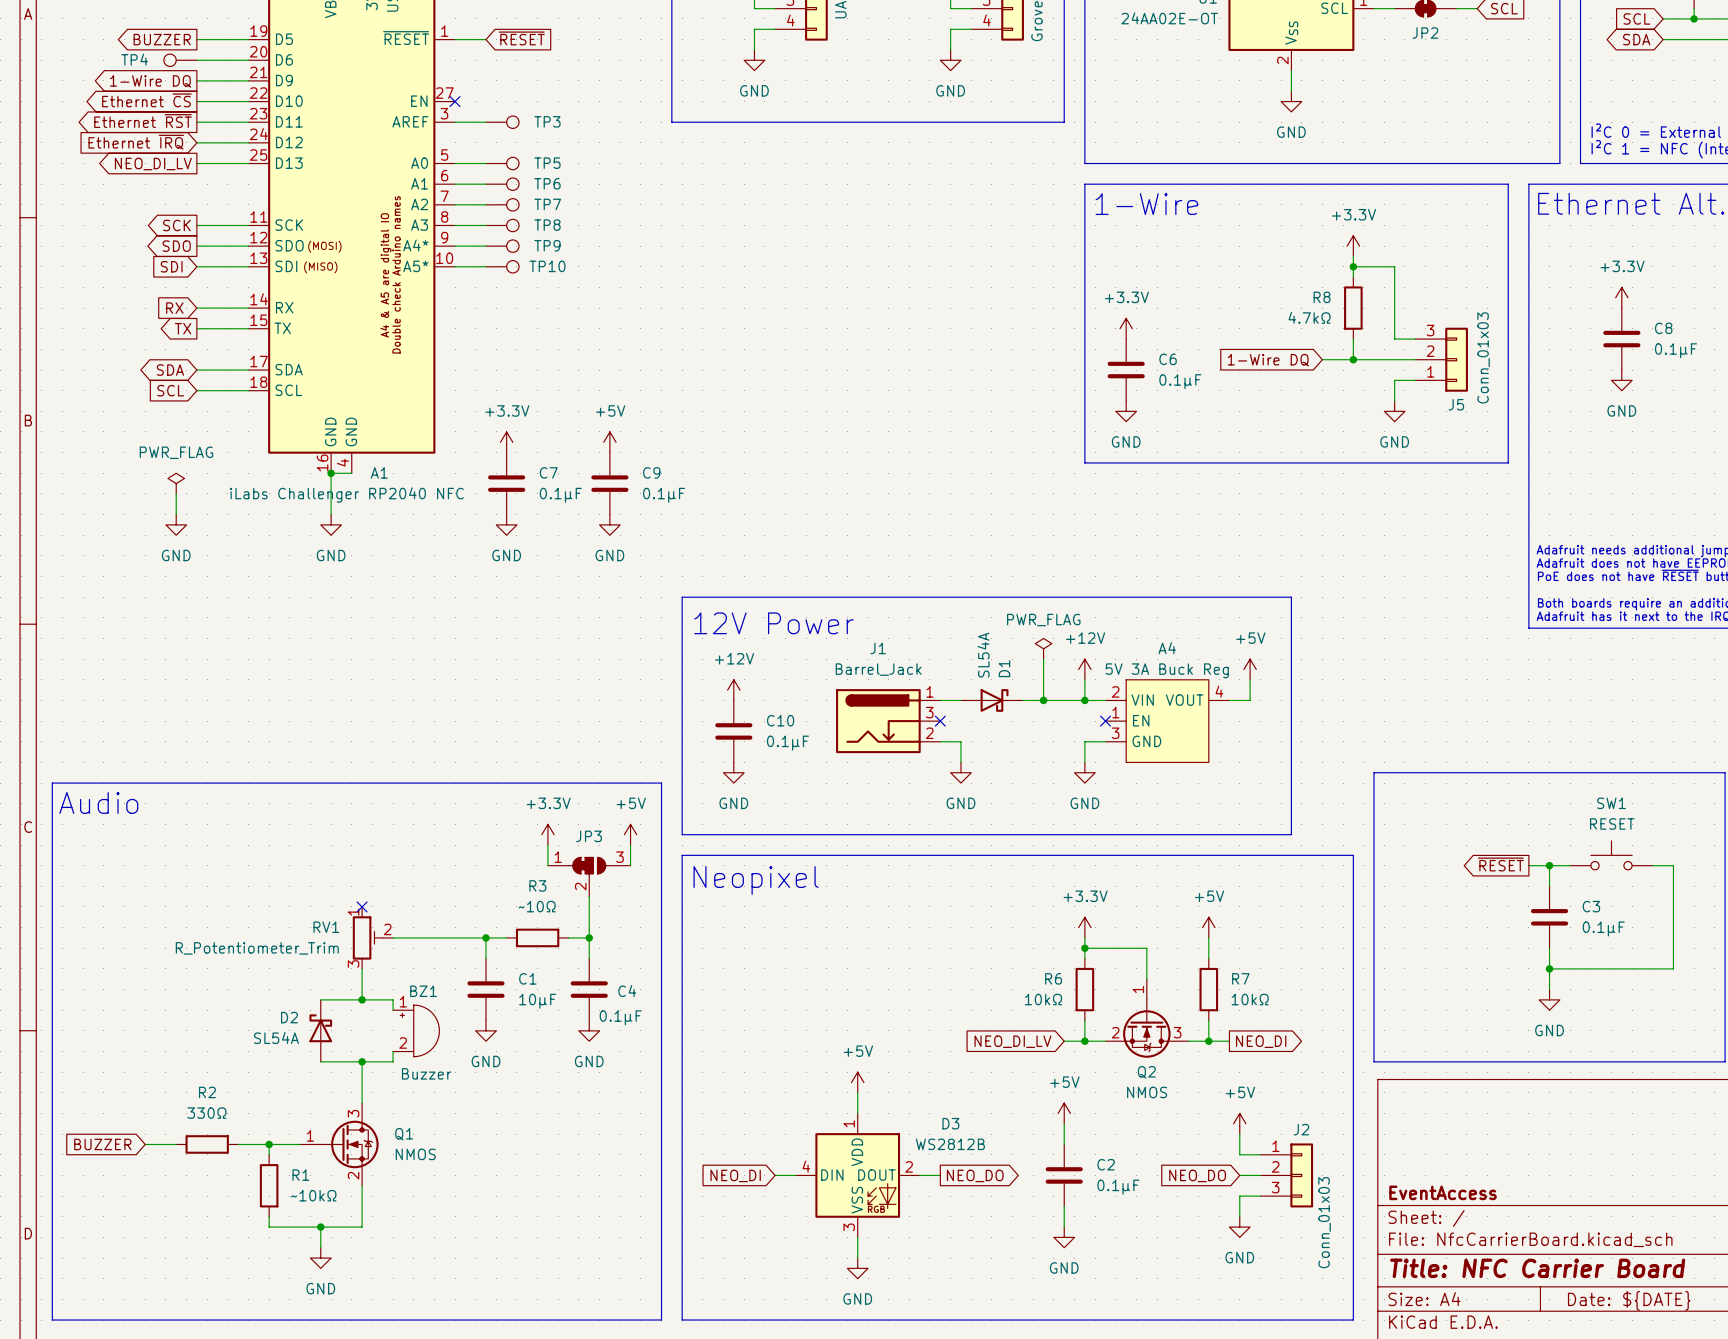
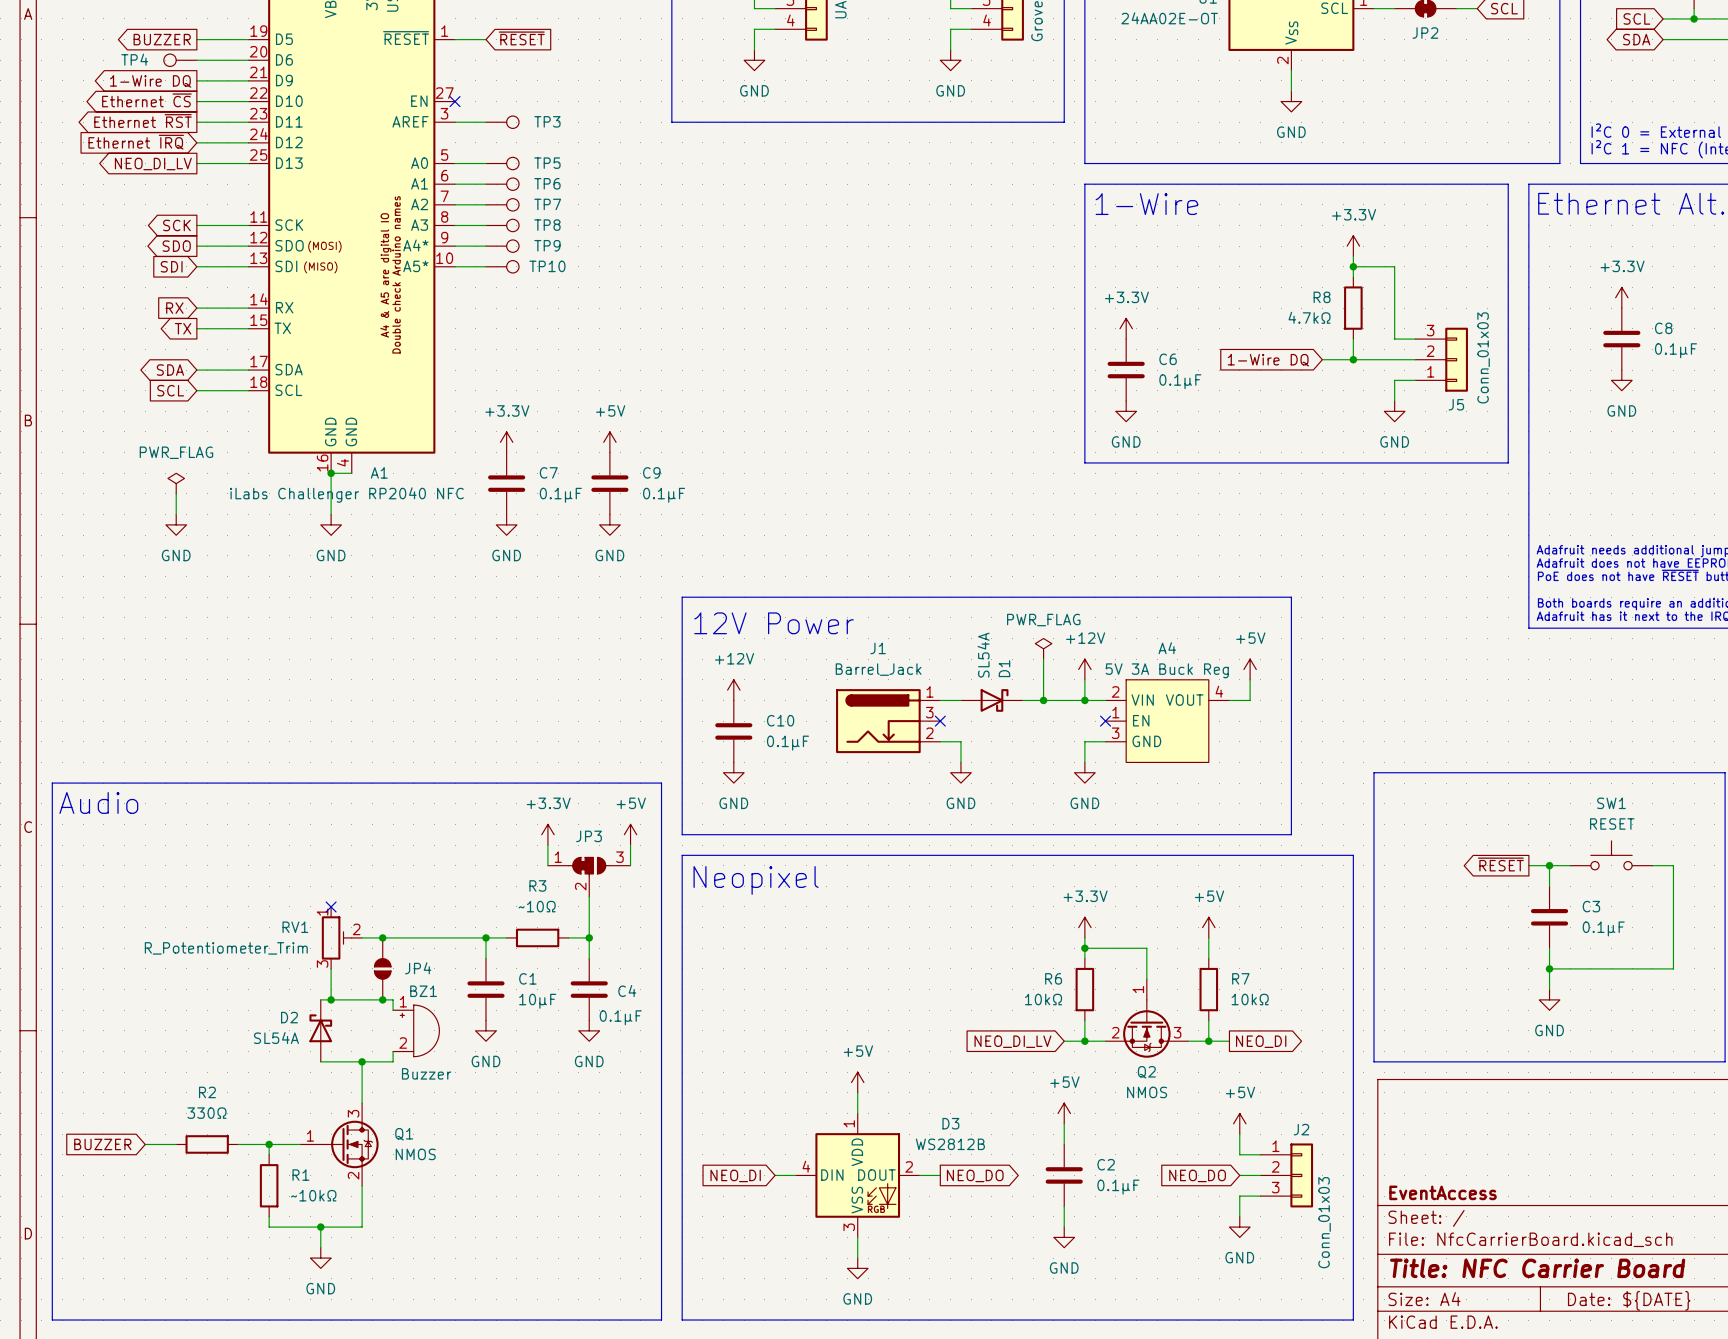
no-connect mark position: (362, 906) -> (331, 906)
RV1 position: (372, 937) -> (341, 937)
junction: none -> (382, 937)
wire: (362, 968) (362, 999) -> (331, 968) (331, 999)
JP4: none -> (382, 968)
junction: none -> (331, 999)
junction: (362, 999) -> none
junction: none -> (382, 999)

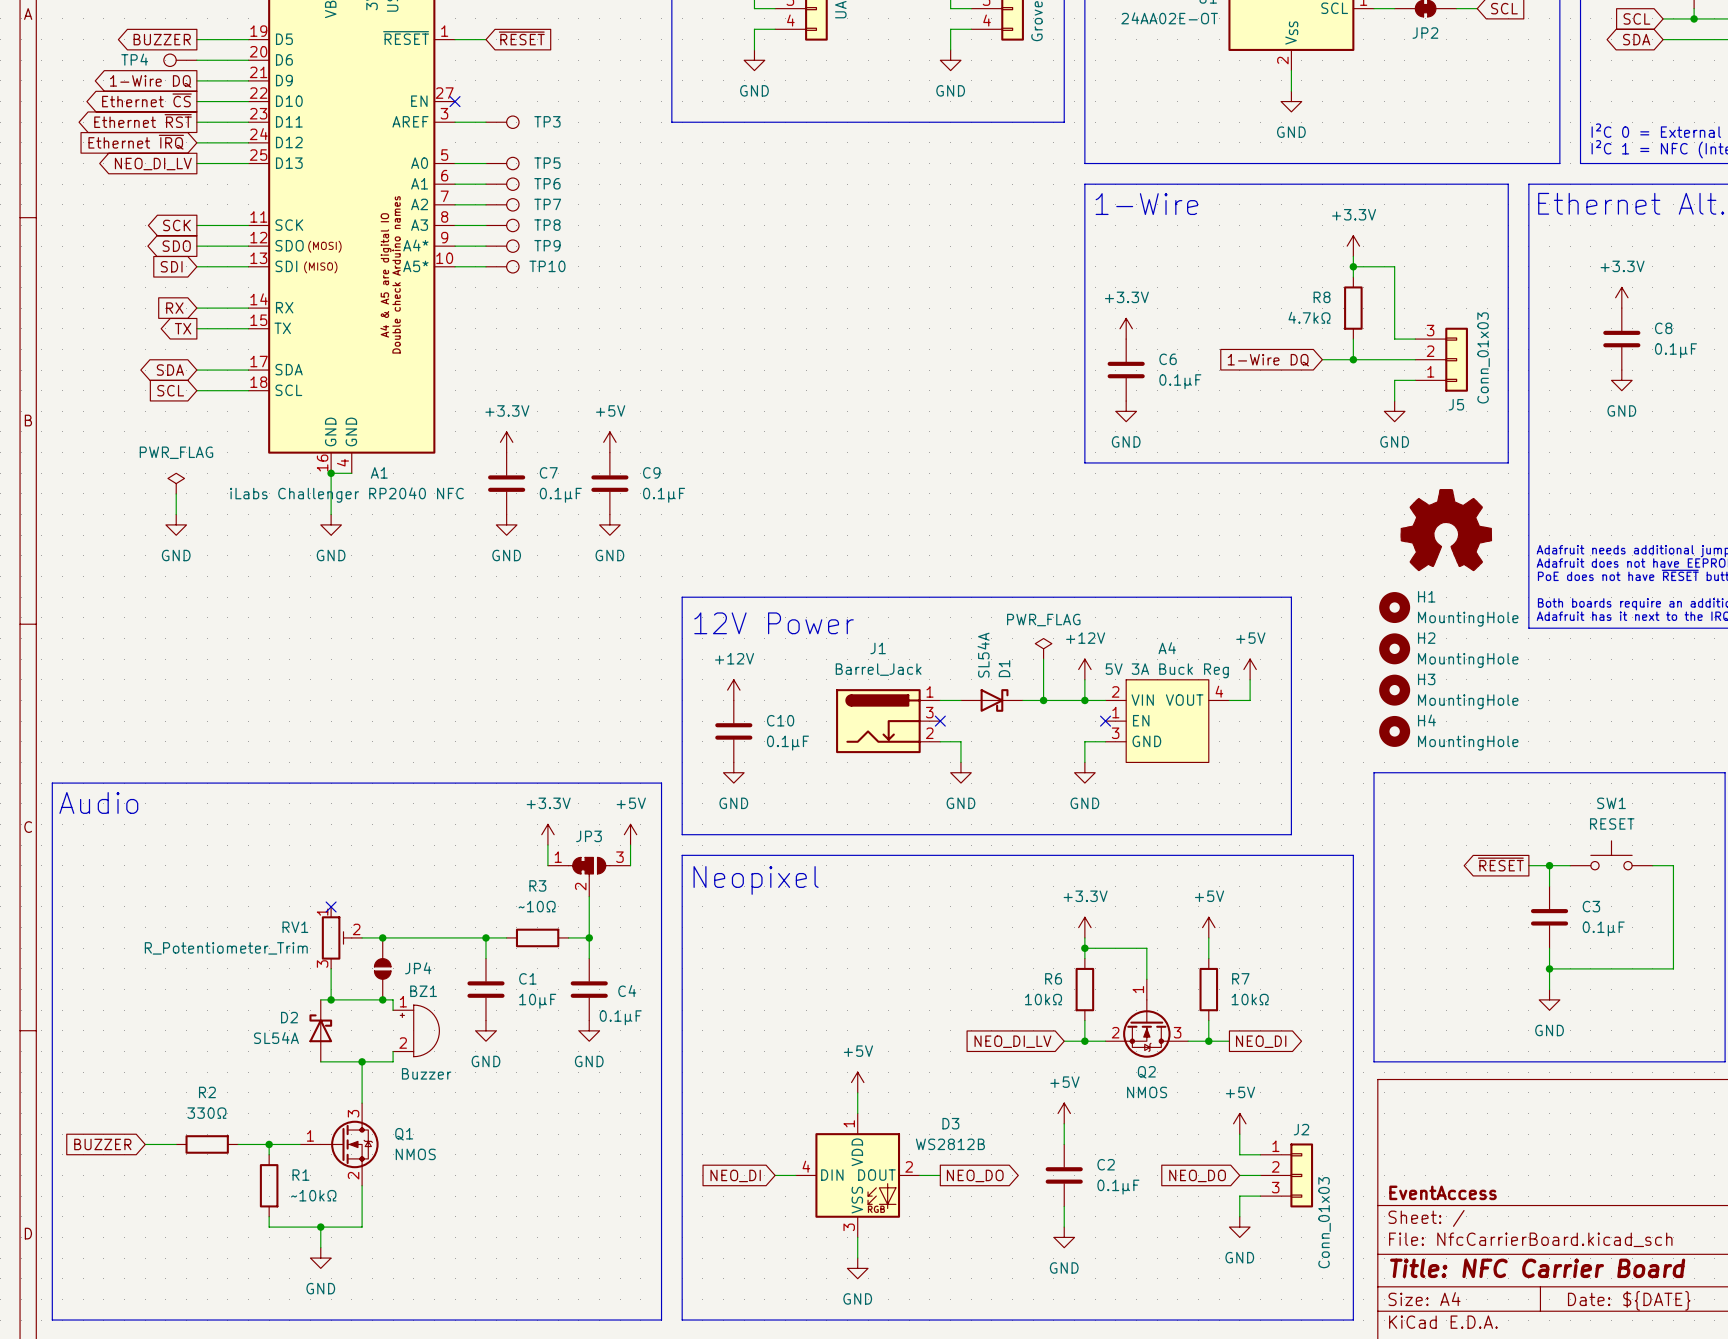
power symbol: none -> (1446, 530)
H1: none -> MountingHole (1394, 607)
H2: none -> MountingHole (1394, 648)
H3: none -> MountingHole (1394, 690)
H4: none -> MountingHole (1394, 731)

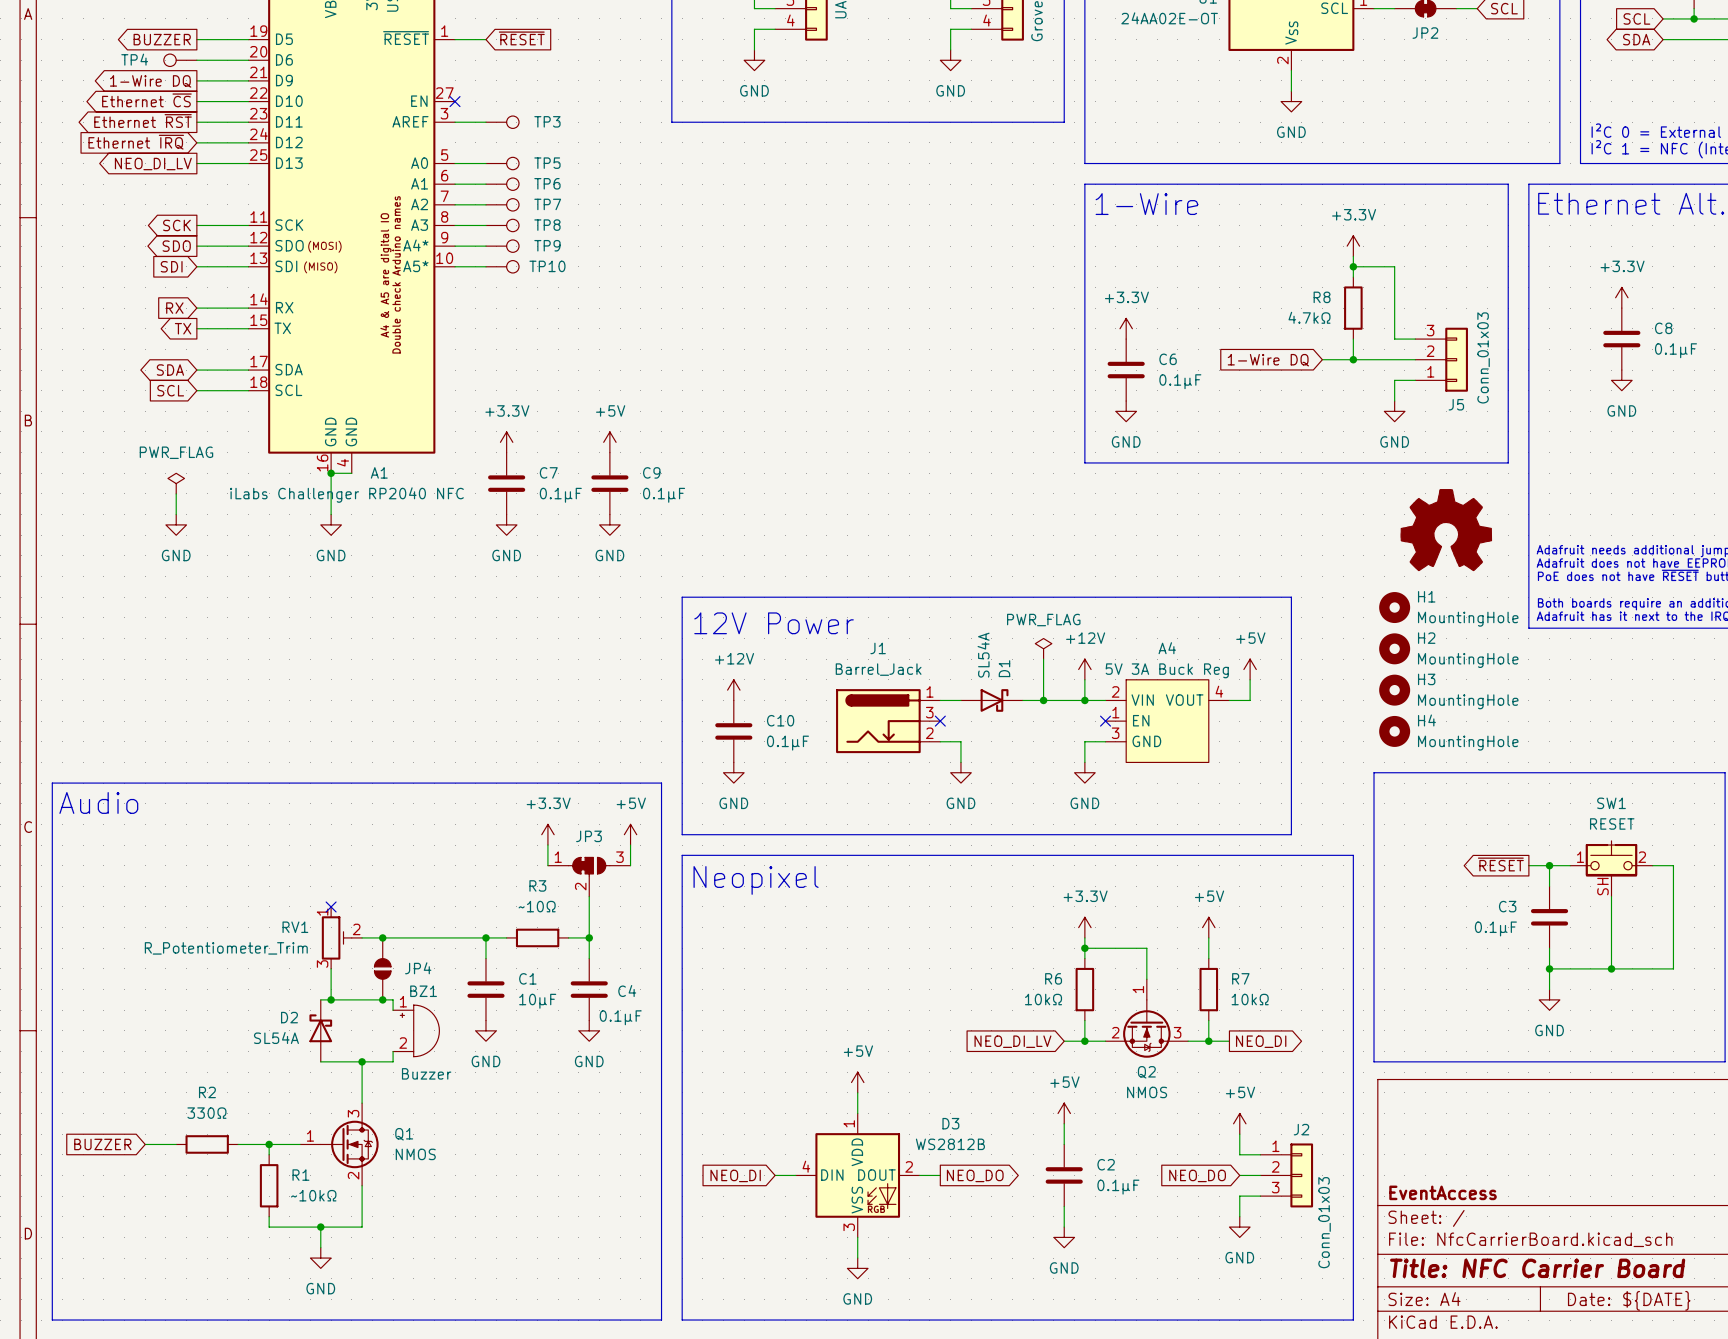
SW1 symbol: [1570, 840, 1653, 870] -> [1570, 840, 1653, 897]
wire: none -> (1611, 896) (1611, 968)
C3 name position: C3 (1591, 906) -> C3 (1507, 906)
C3 value position: 0.1µF (1603, 928) -> 0.1µF (1495, 928)
junction: none -> (1611, 968)

